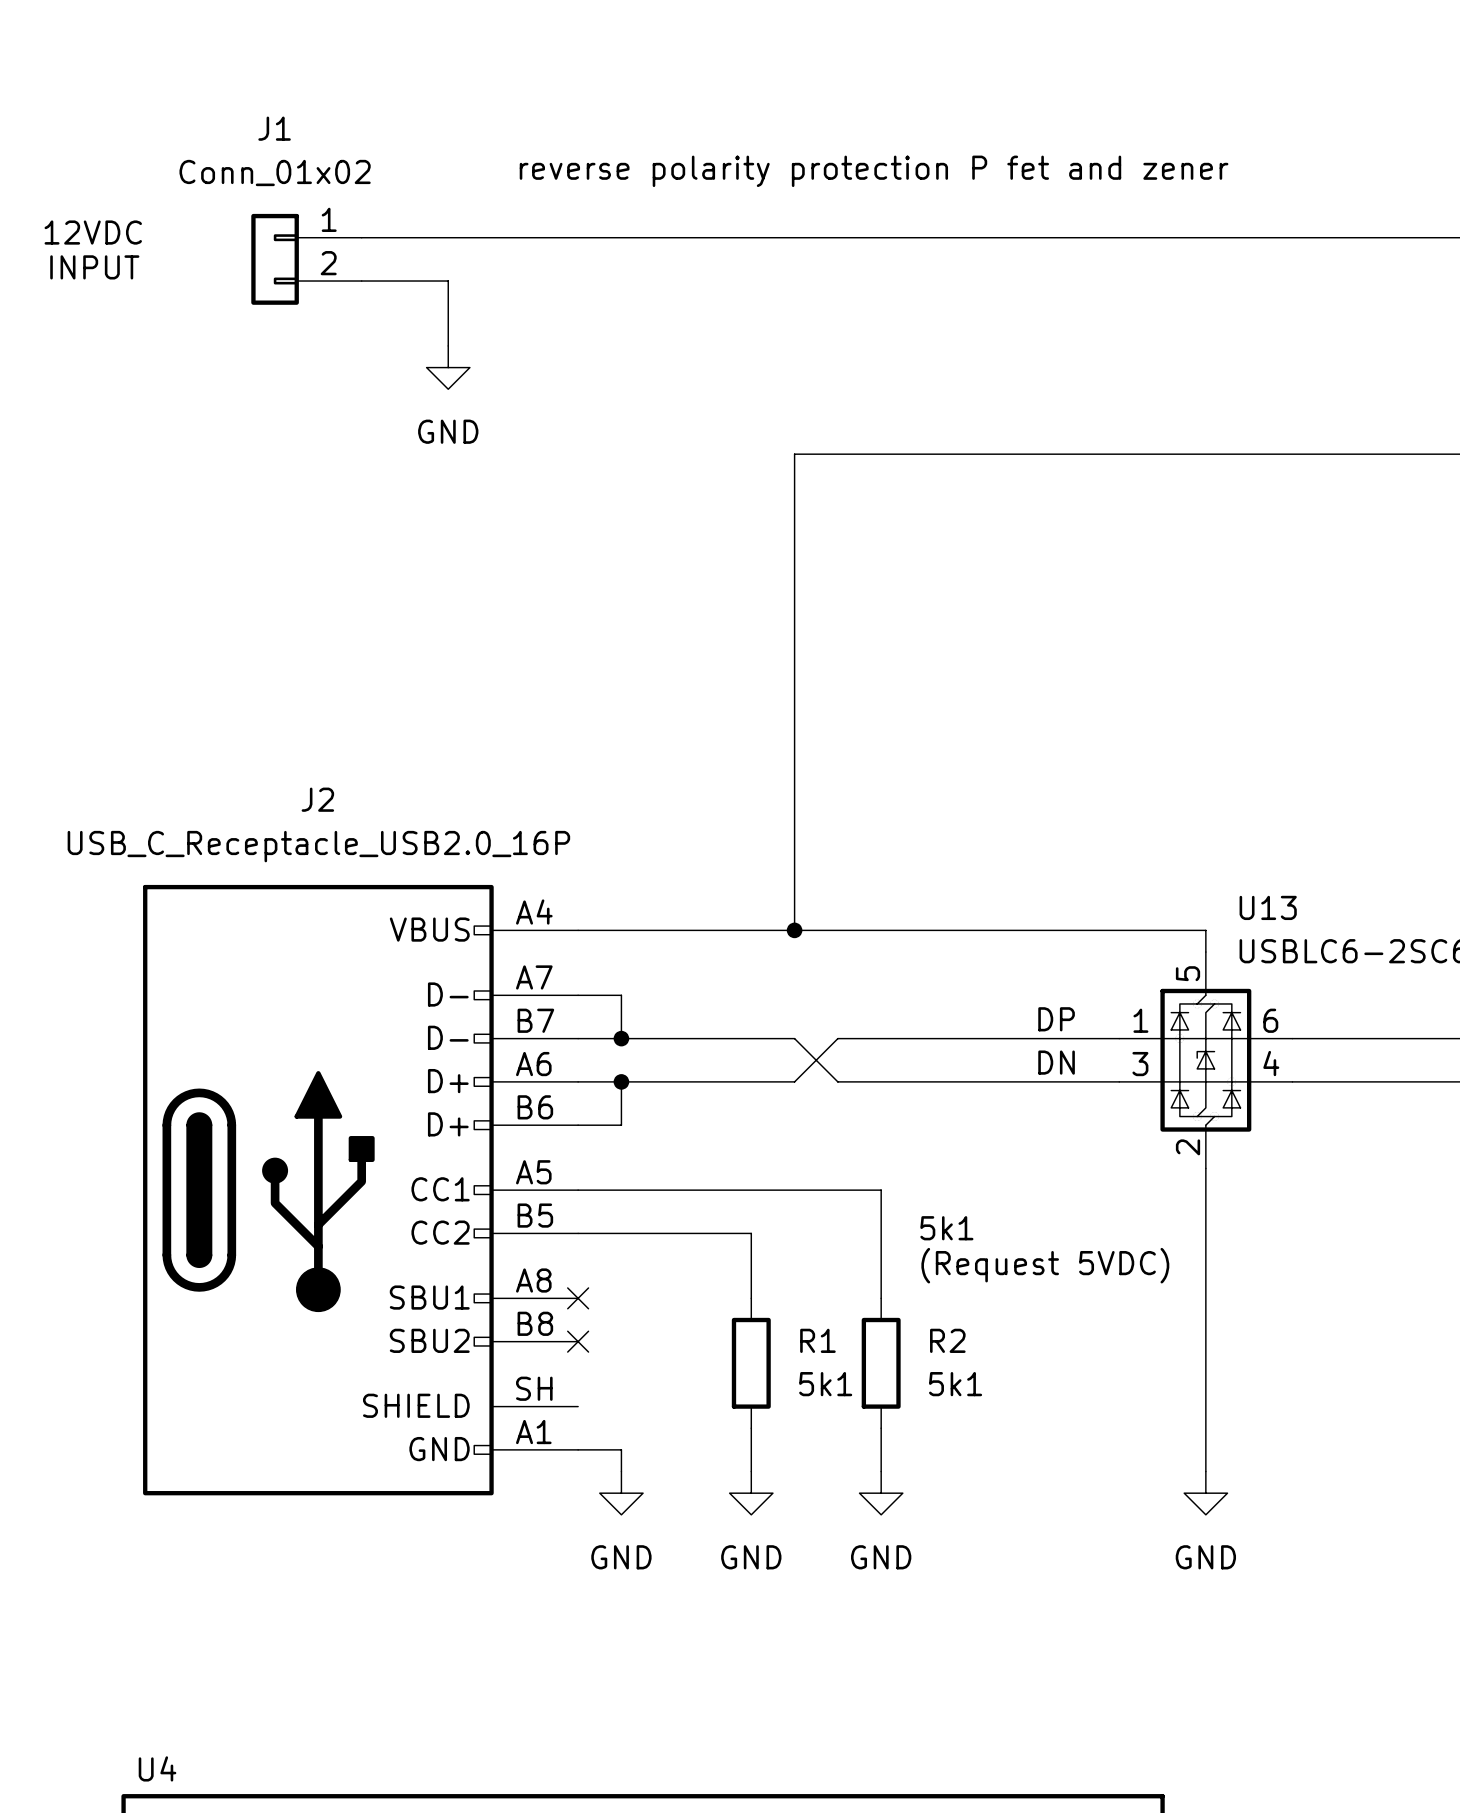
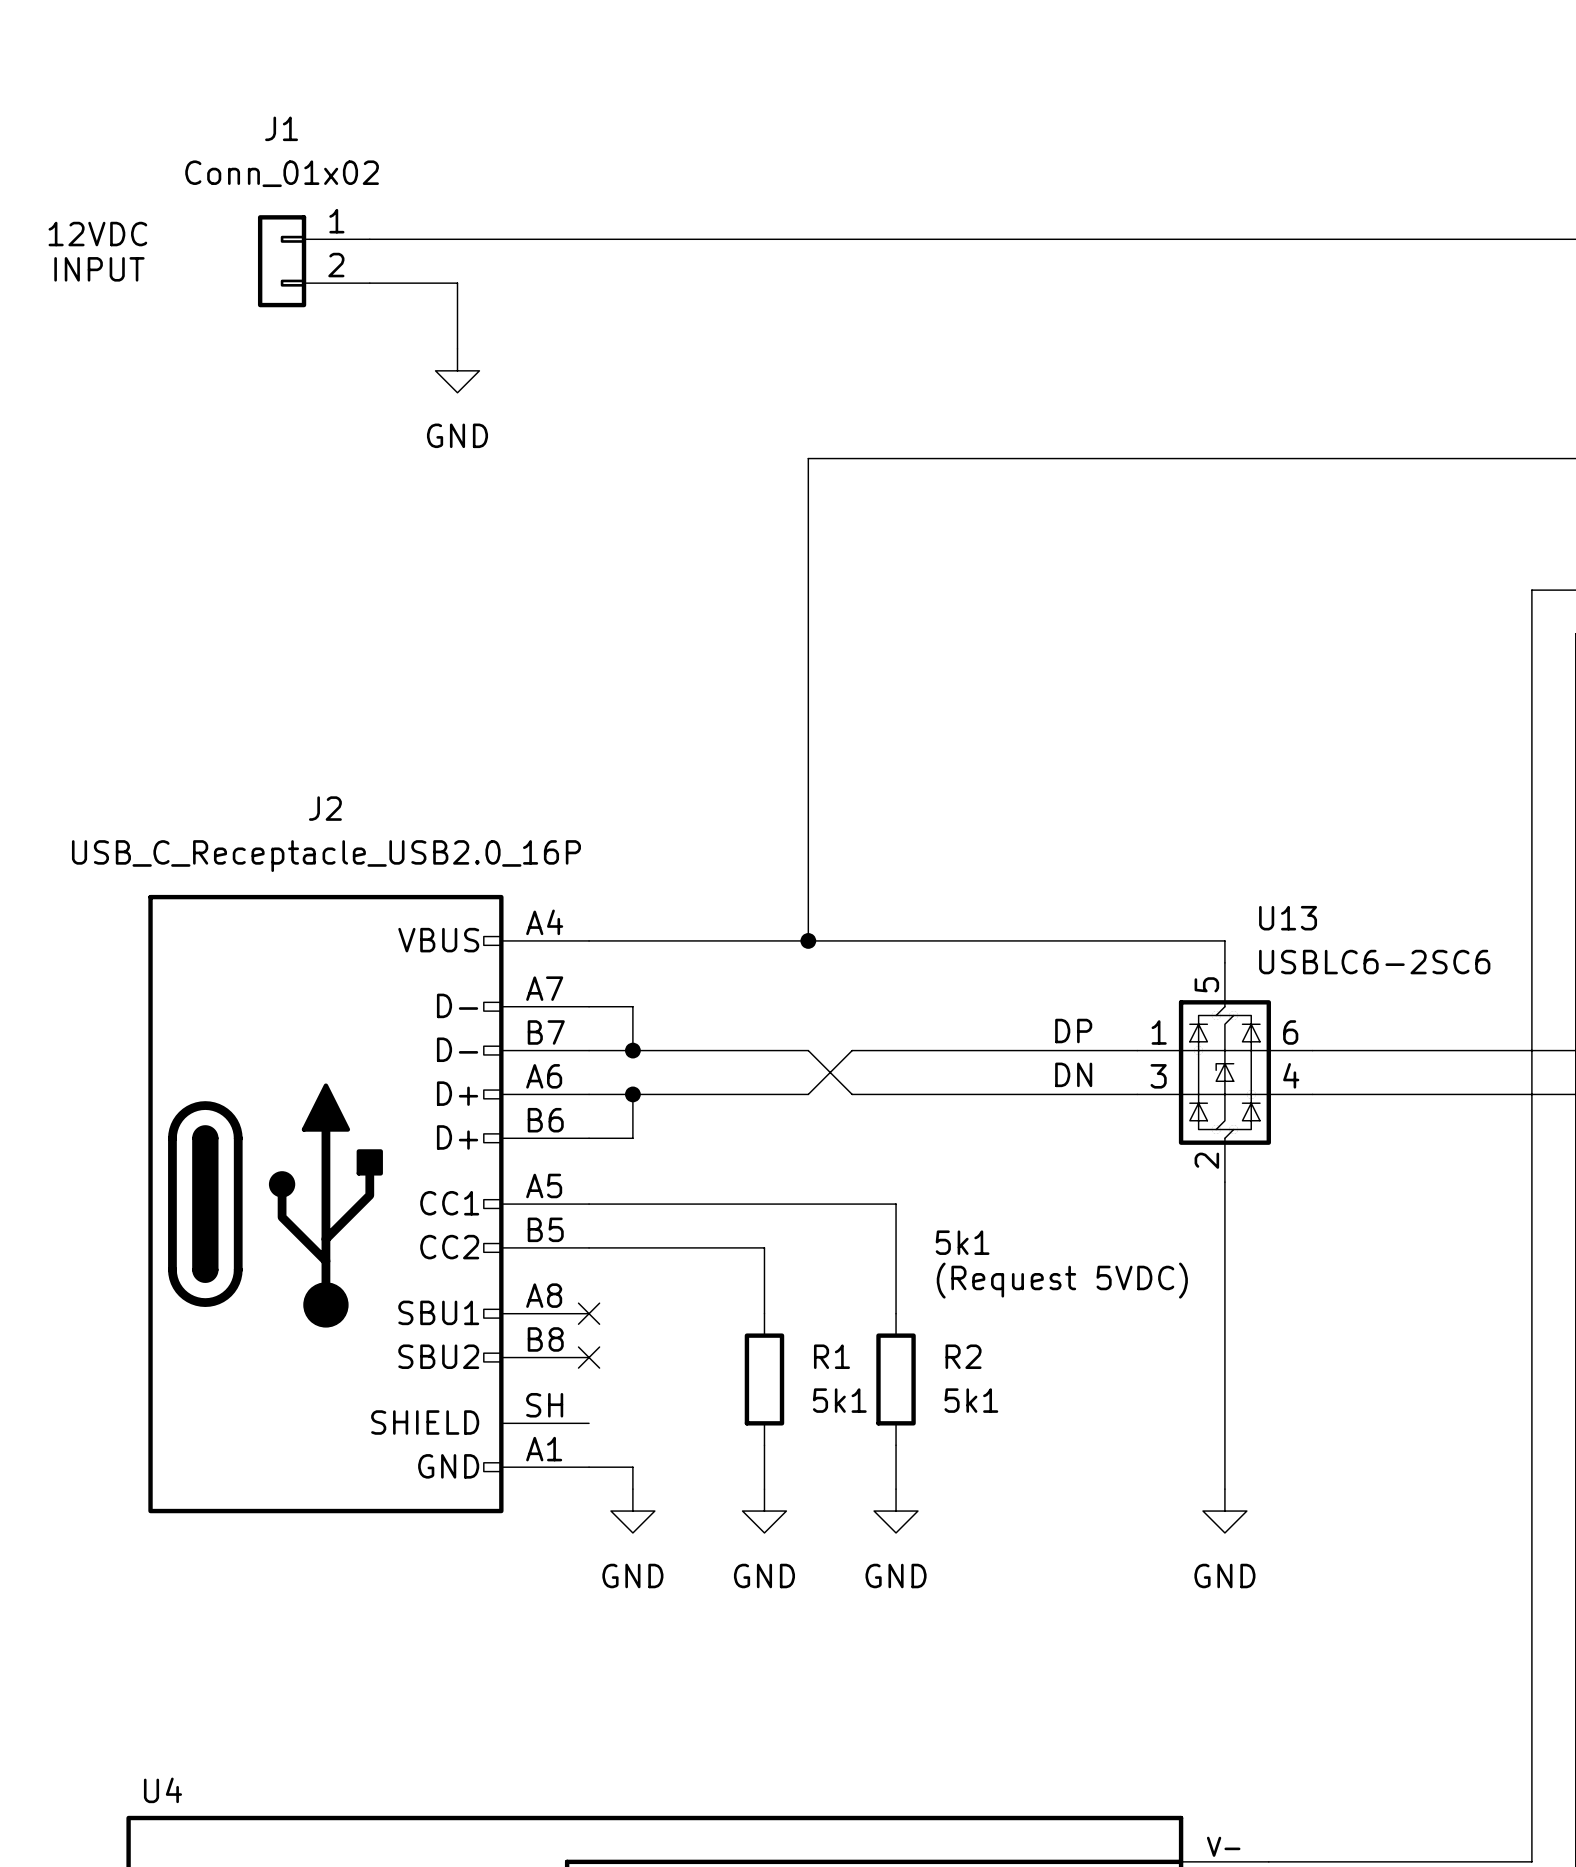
text: reverse polarity protection P fet and zener (874, 171) -> none

